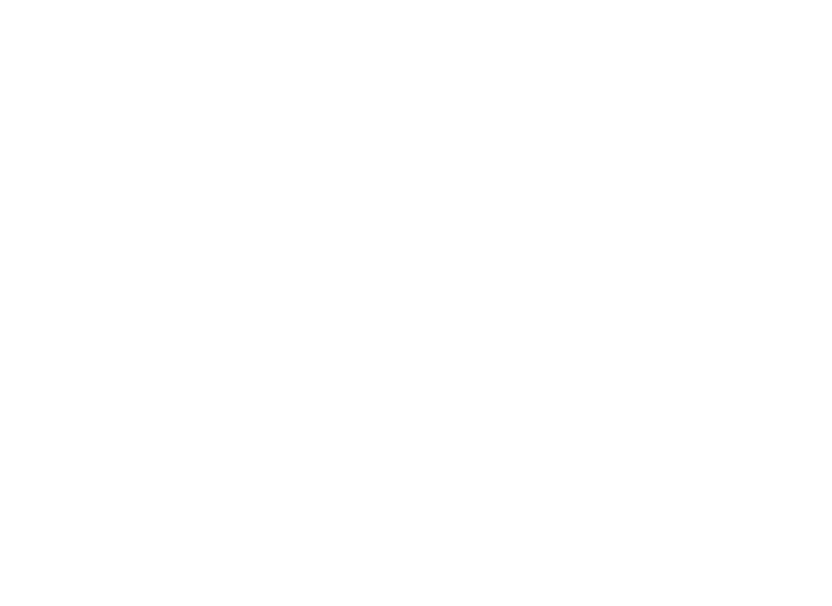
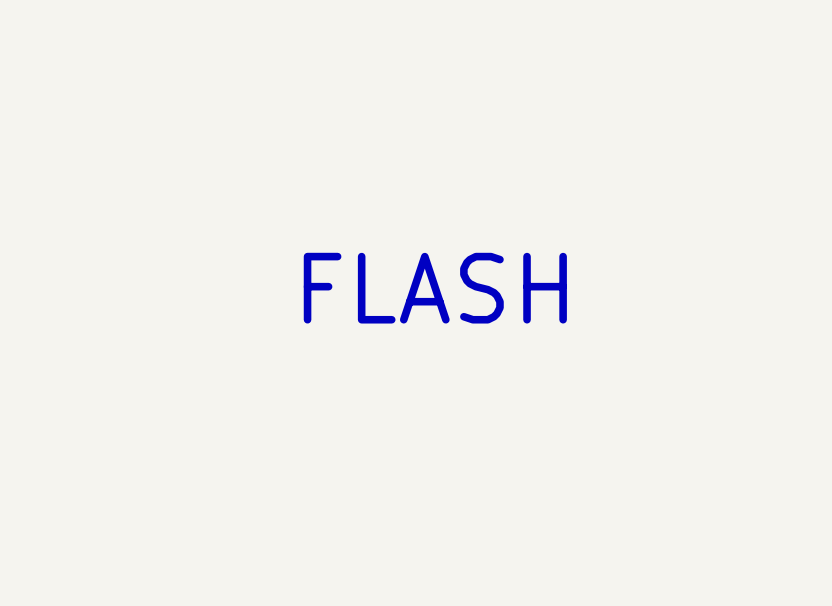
text: none -> FLASH (435, 288)

